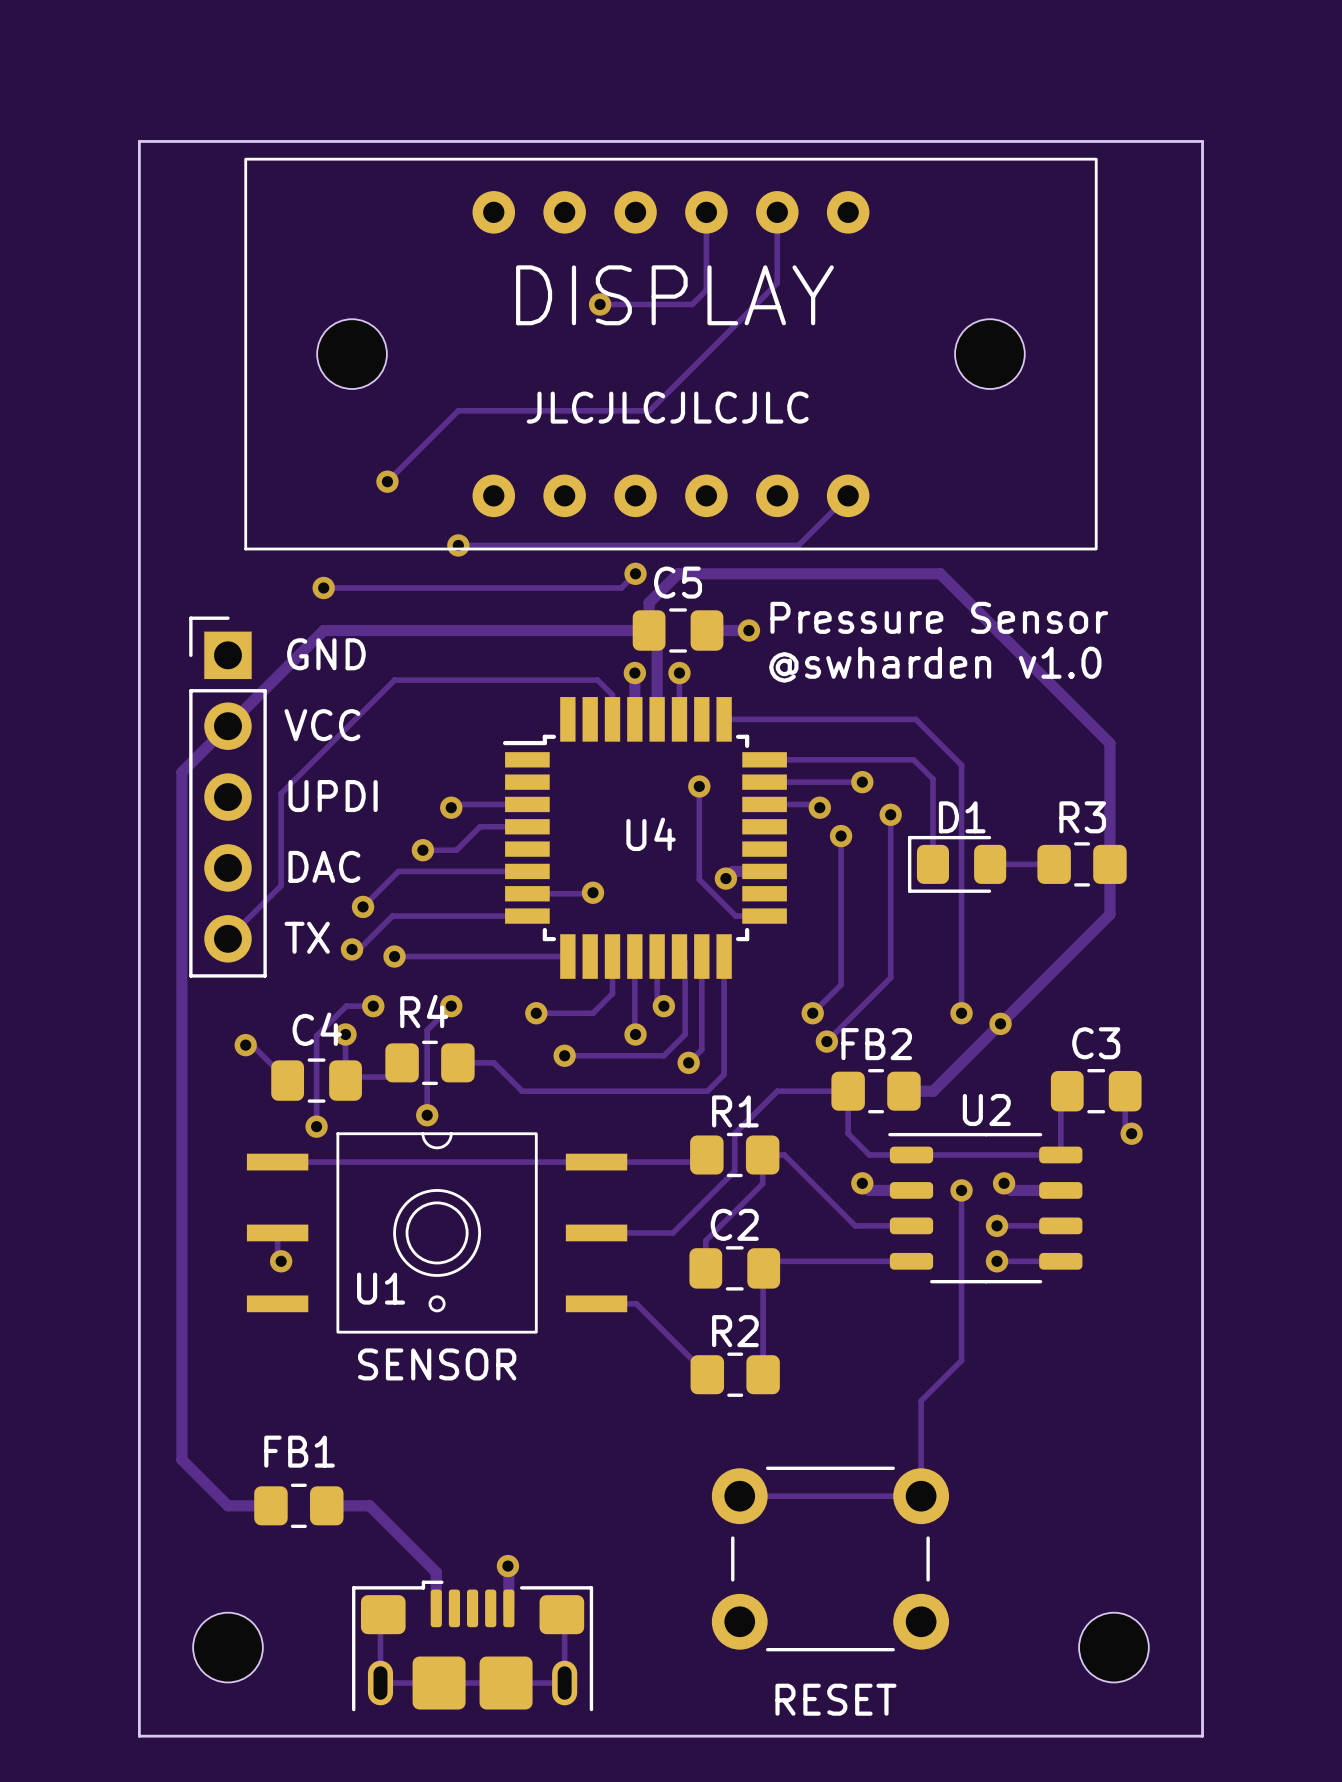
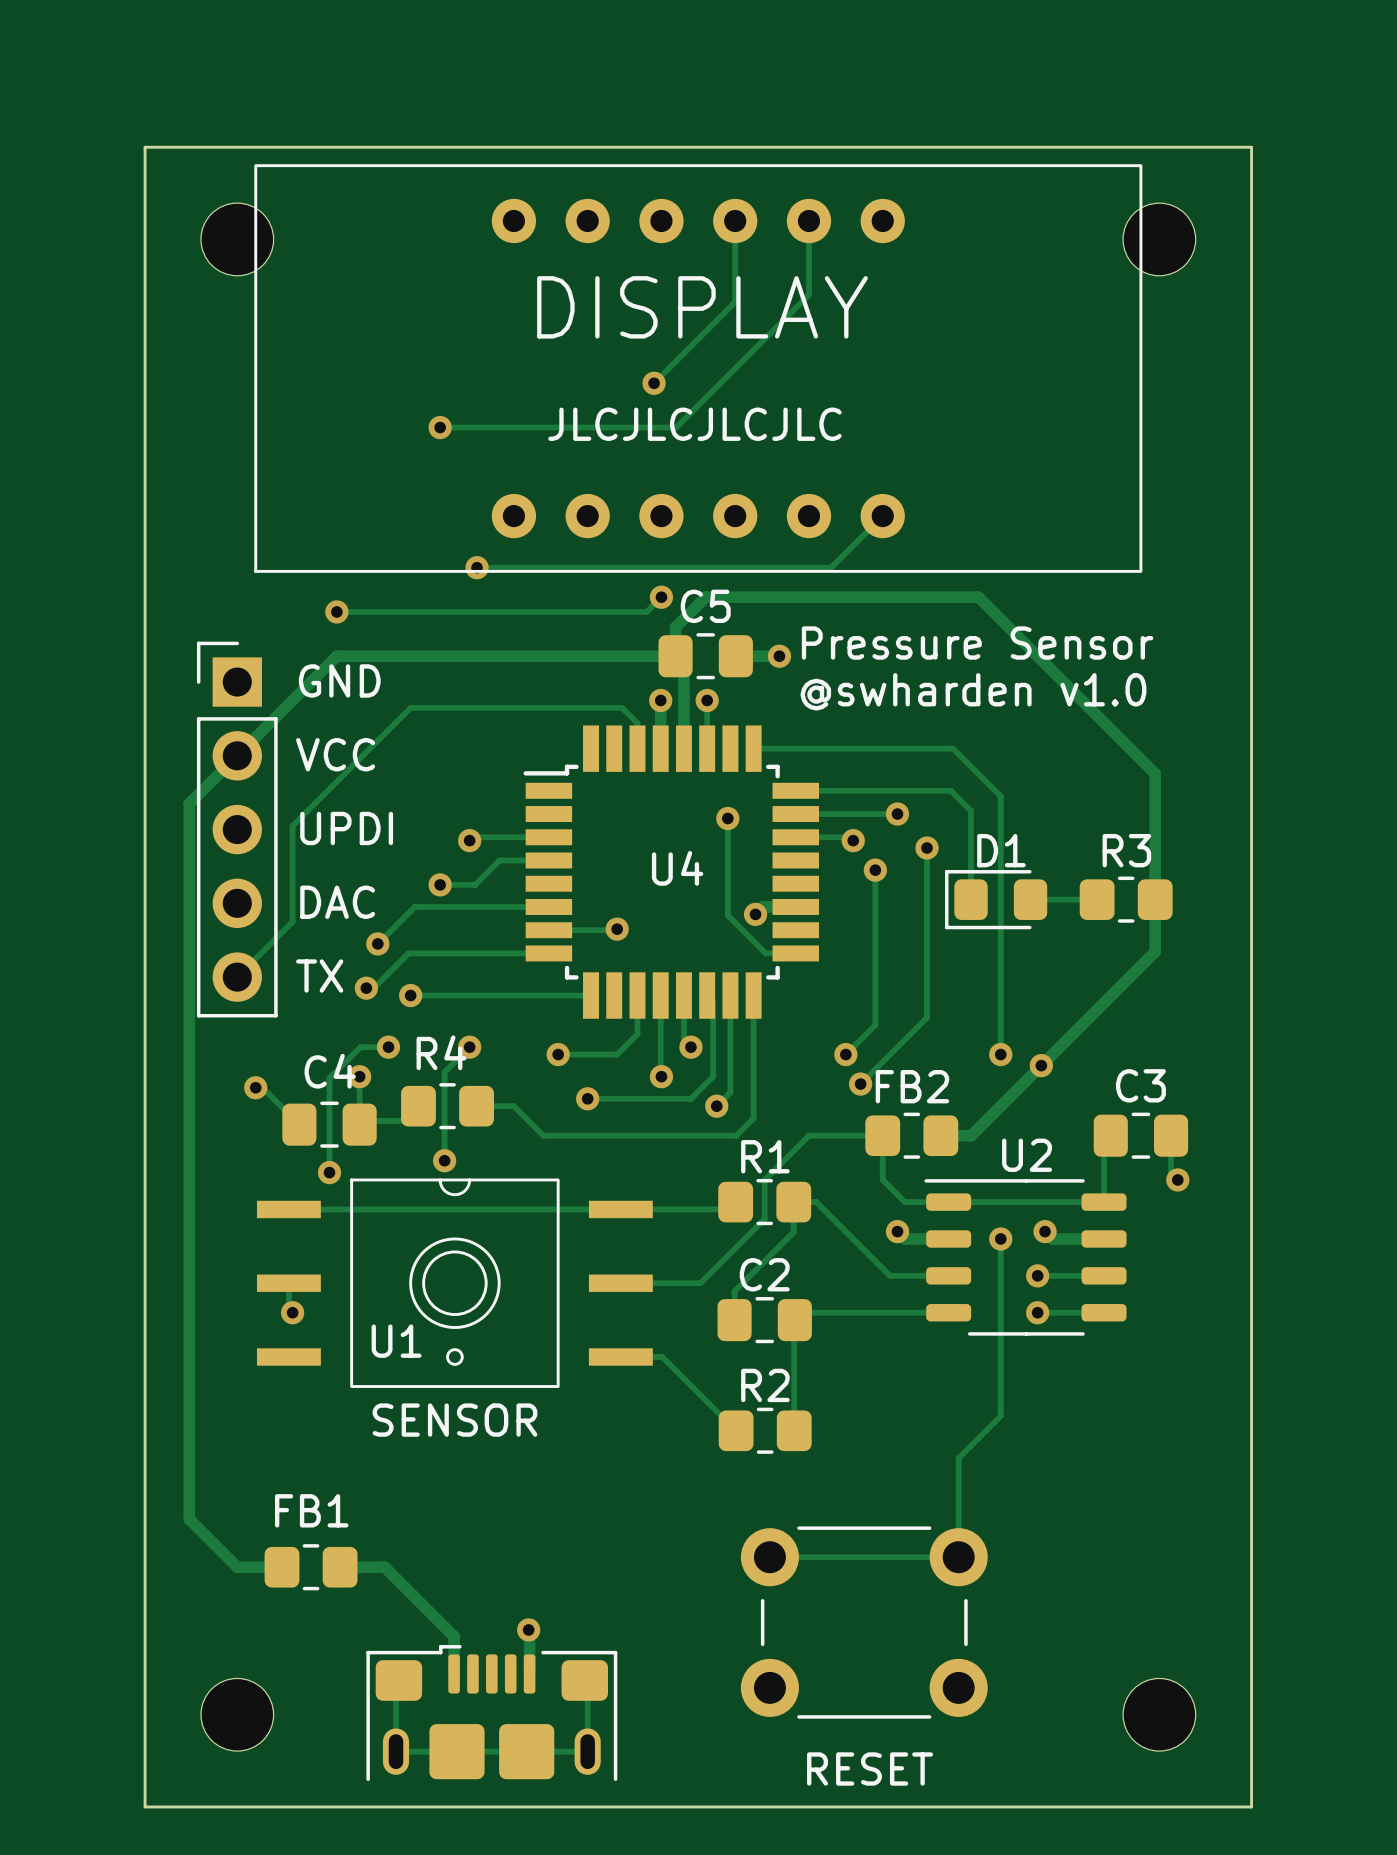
track: (600, 304) (692, 304) -> (654, 383) (720, 316)
via position: (600, 304) -> (654, 383)
part position: (352, 354) -> (237, 239)
part position: (989, 354) -> (1159, 239)
track: (458, 410) (387, 481) -> (477, 427) (440, 427)
via position: (387, 481) -> (440, 427)

